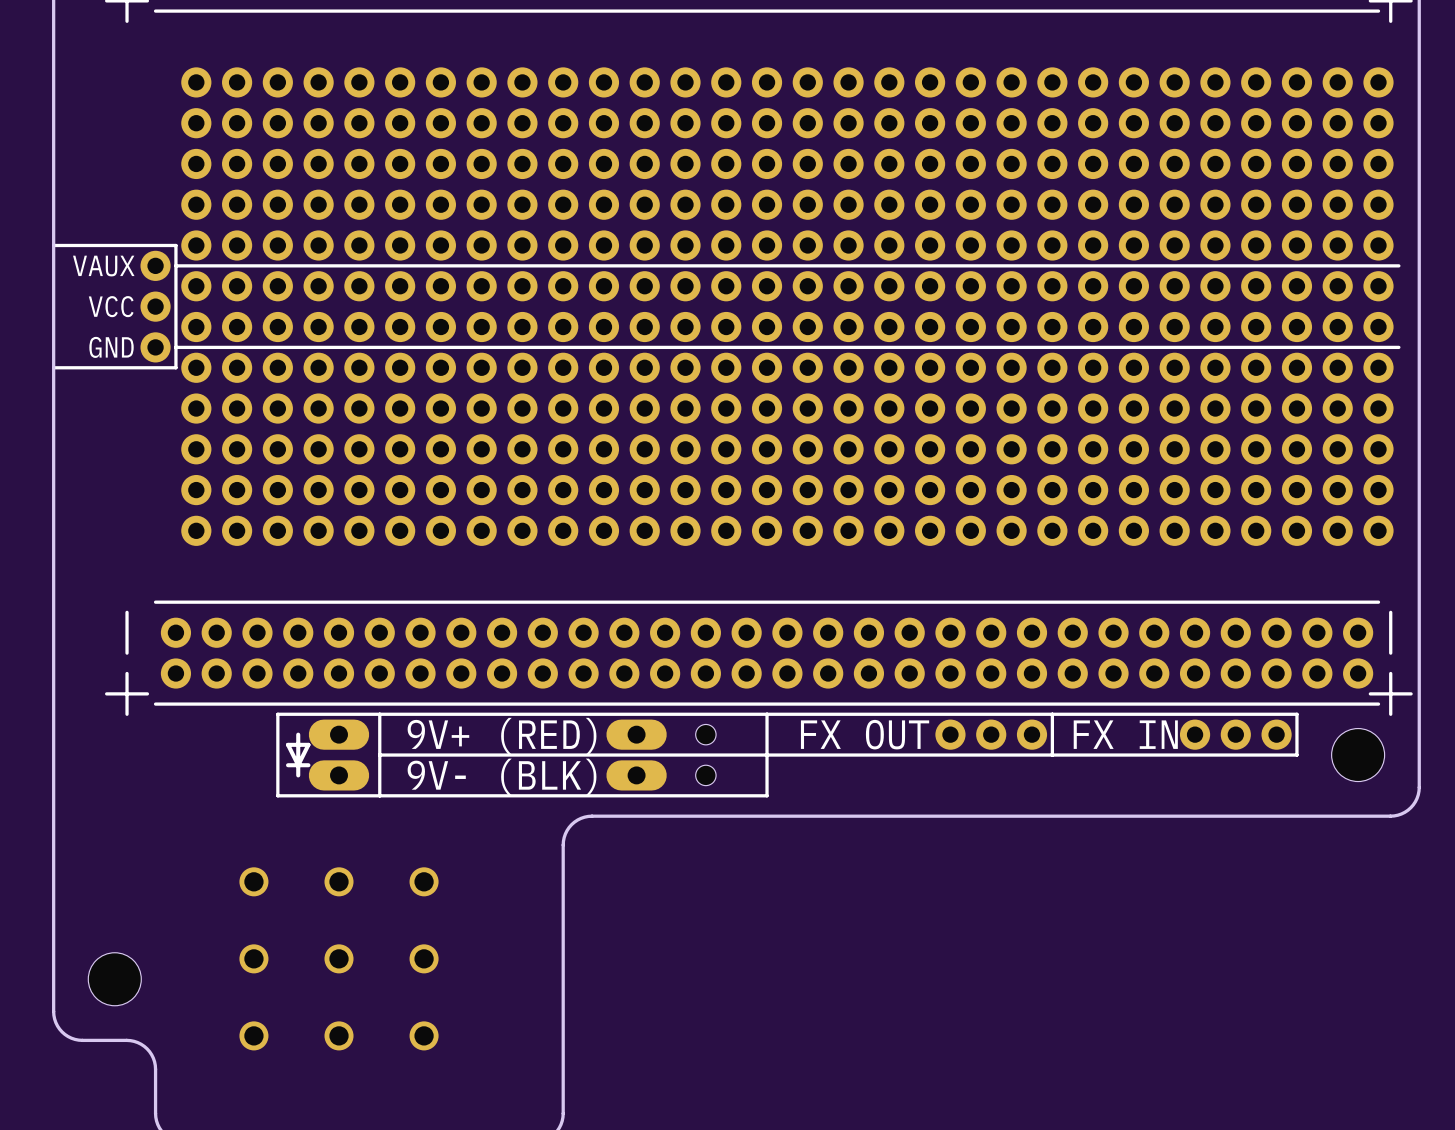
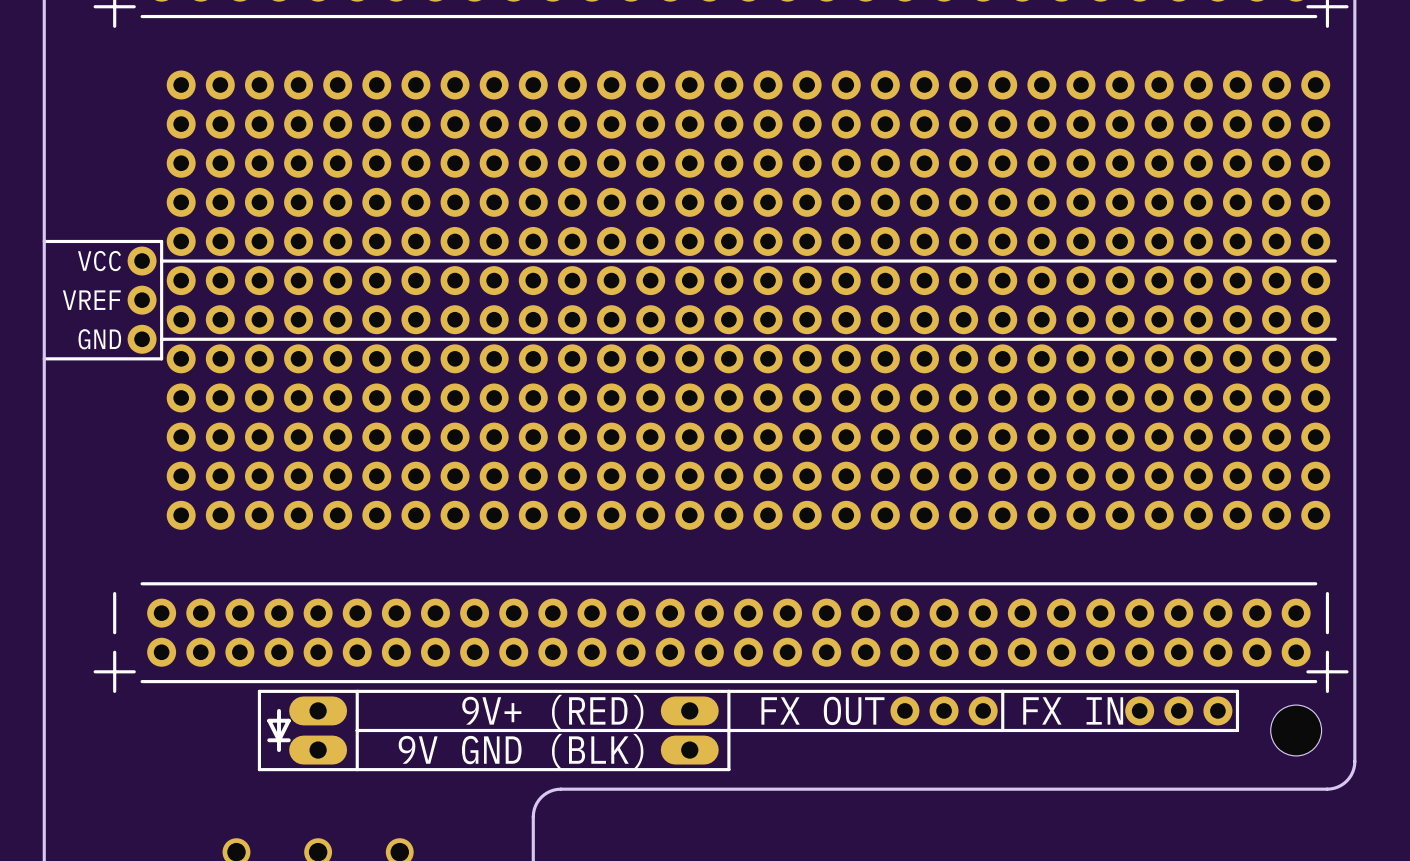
text: VAUX (103, 266) -> VCC (99, 261)
text: VCC (111, 306) -> VREF (91, 300)
hole: (705, 734) -> none
text position: 9V+ (RED) (502, 736) -> 9V+ (RED) (552, 712)
part position: (636, 755) -> (689, 730)
hole: (705, 775) -> none
text: 9V- (BLK) (502, 776) -> 9V GND (BLK) (521, 751)

